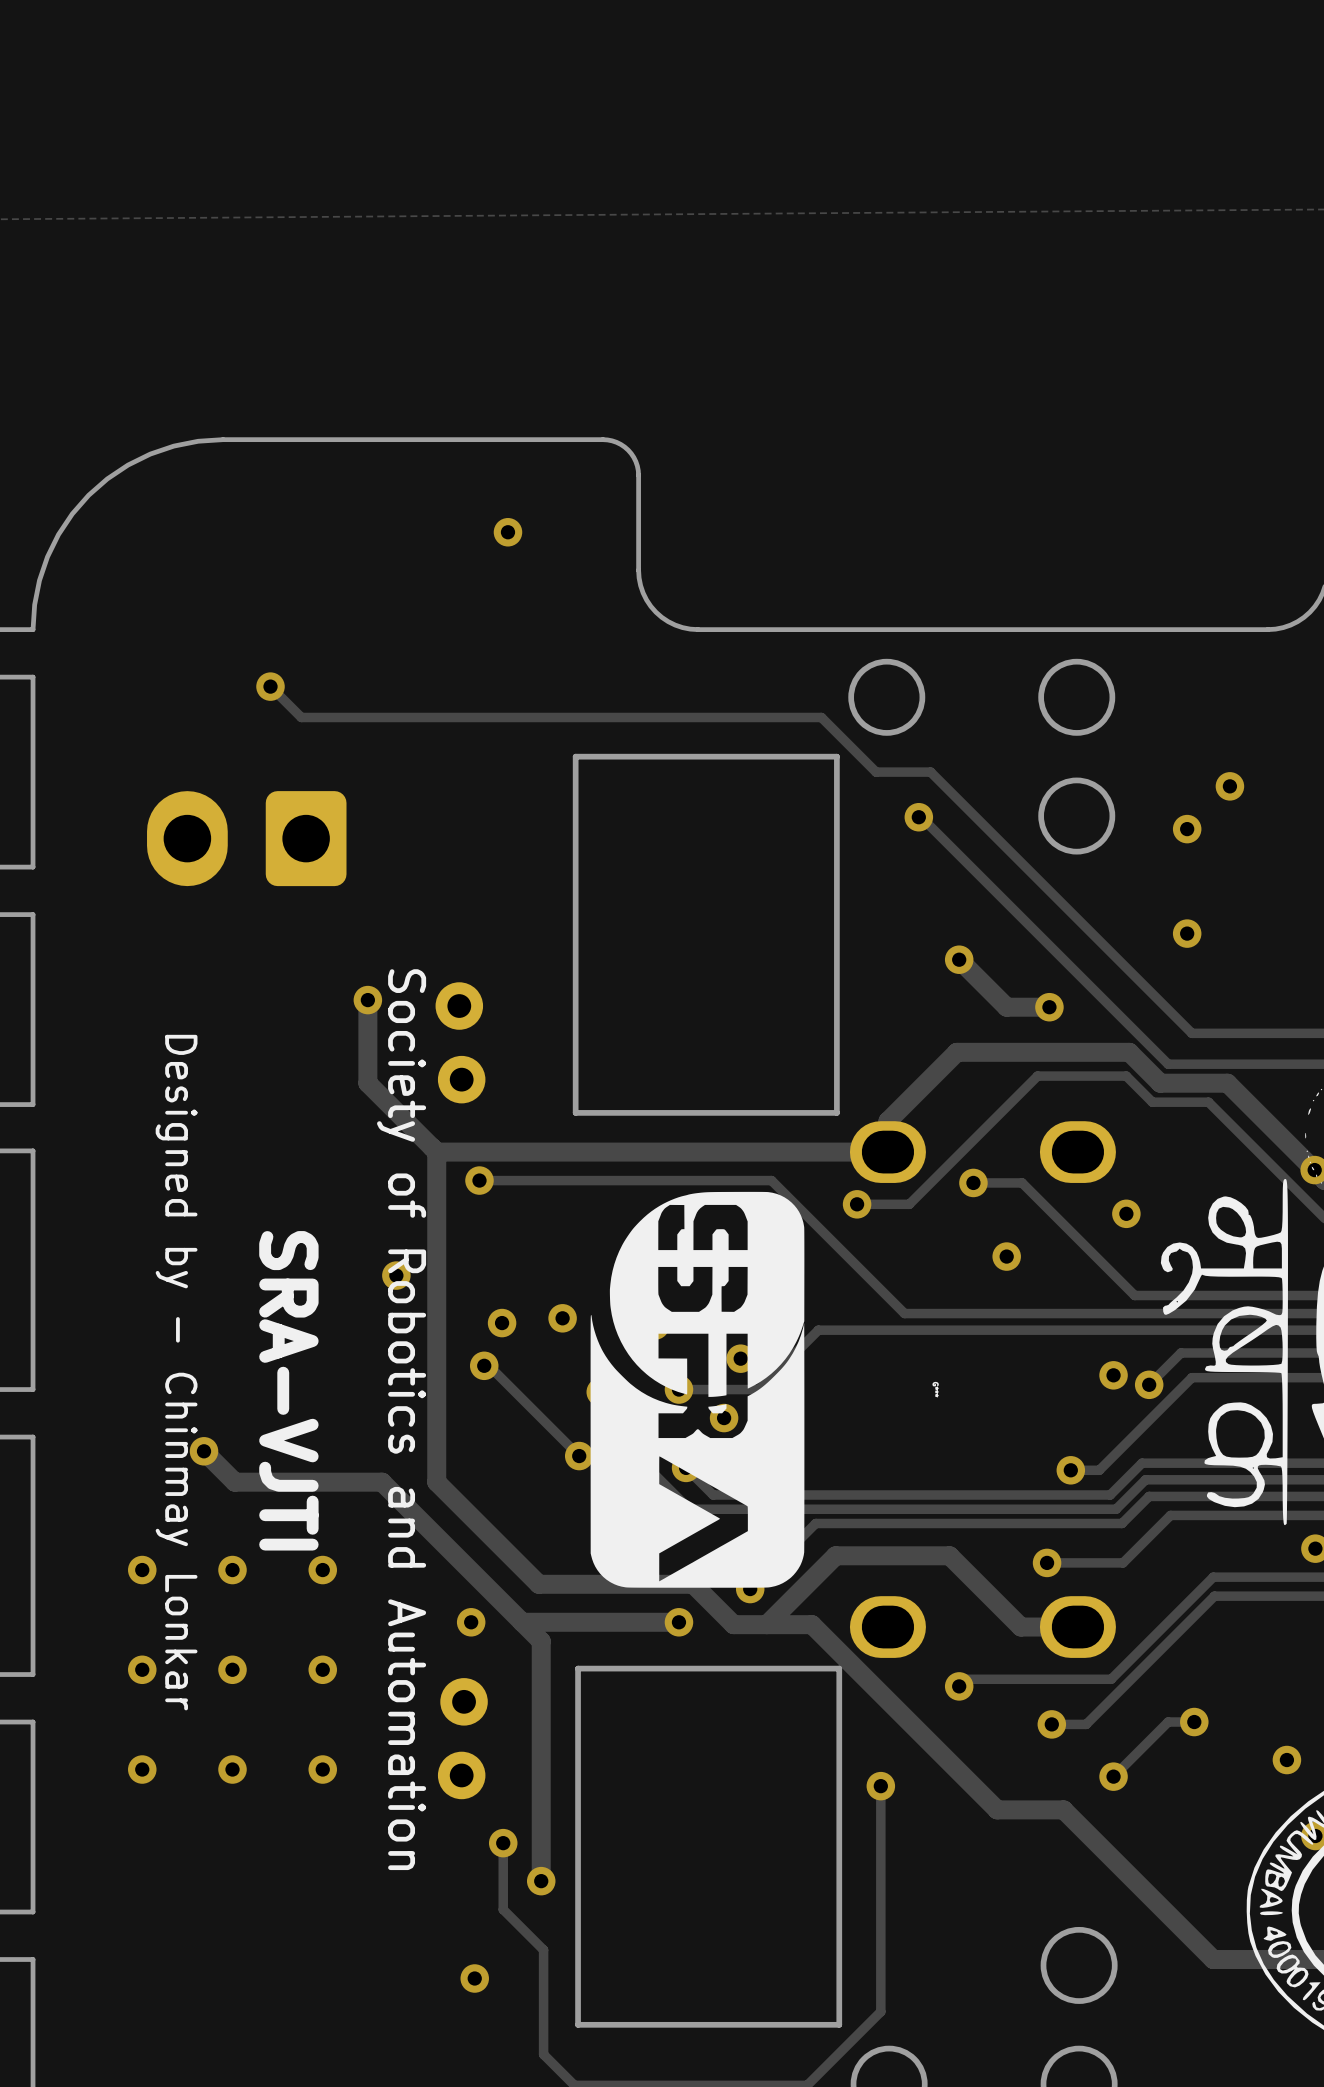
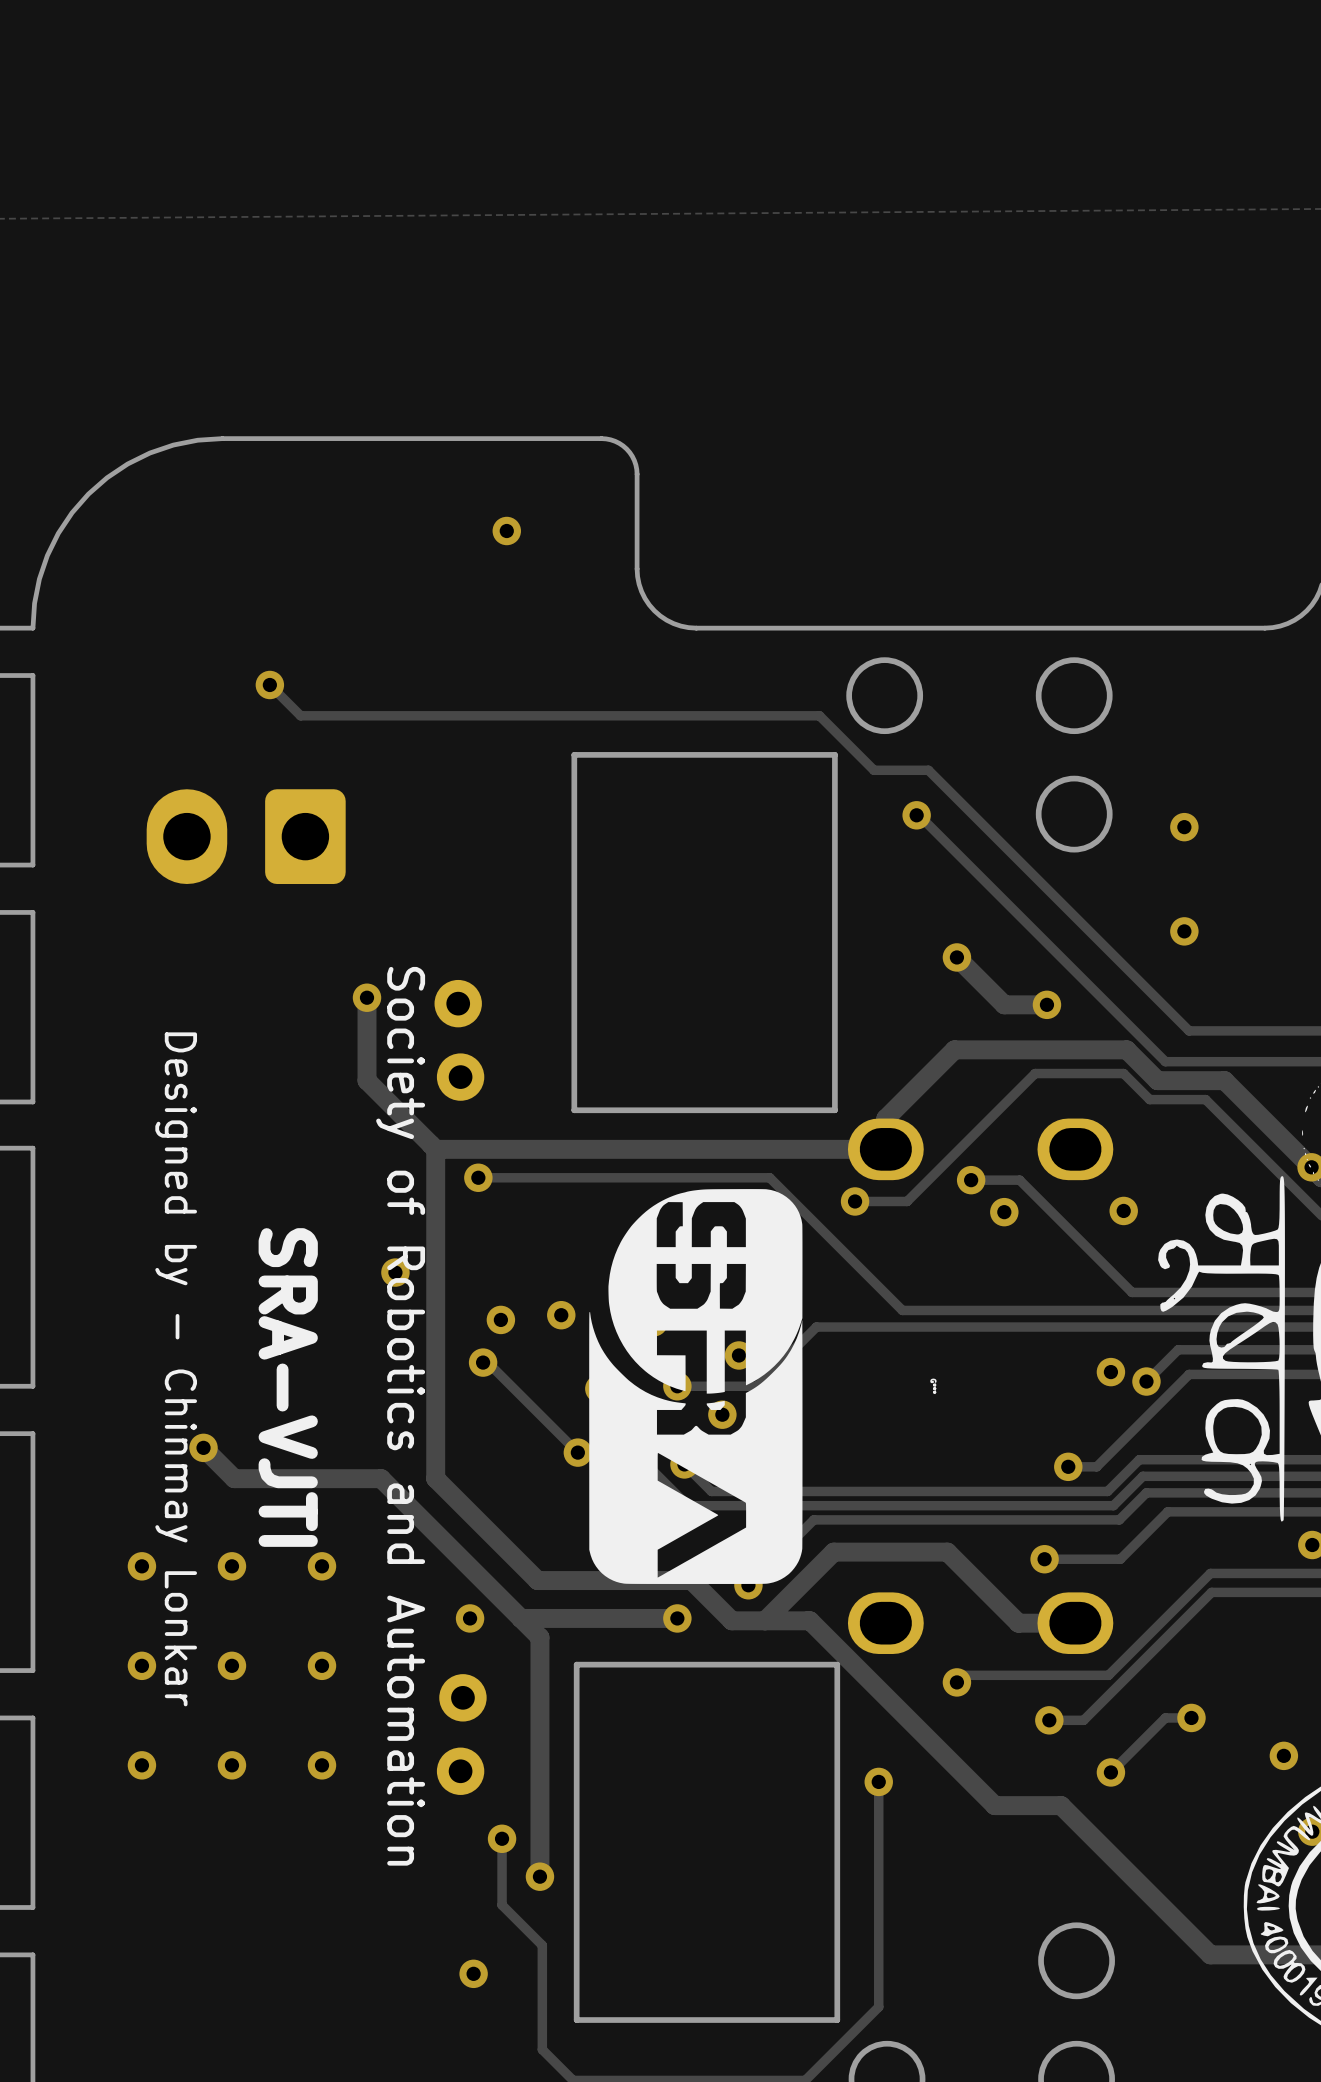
via: (1229, 786) -> none
via position: (1006, 1256) -> (1004, 1212)

